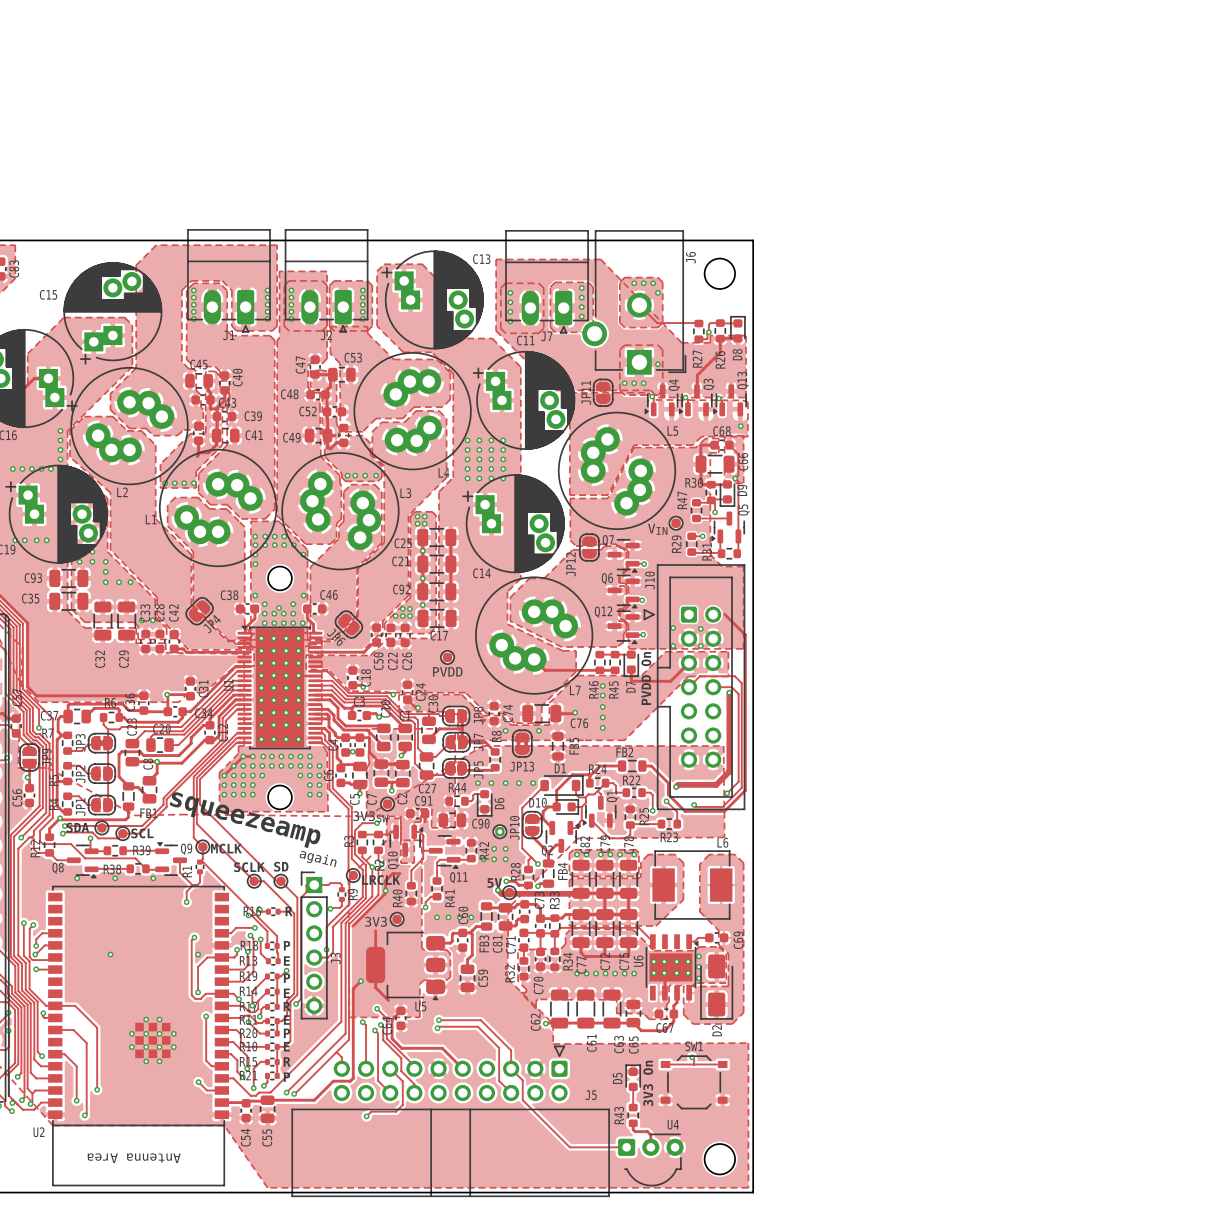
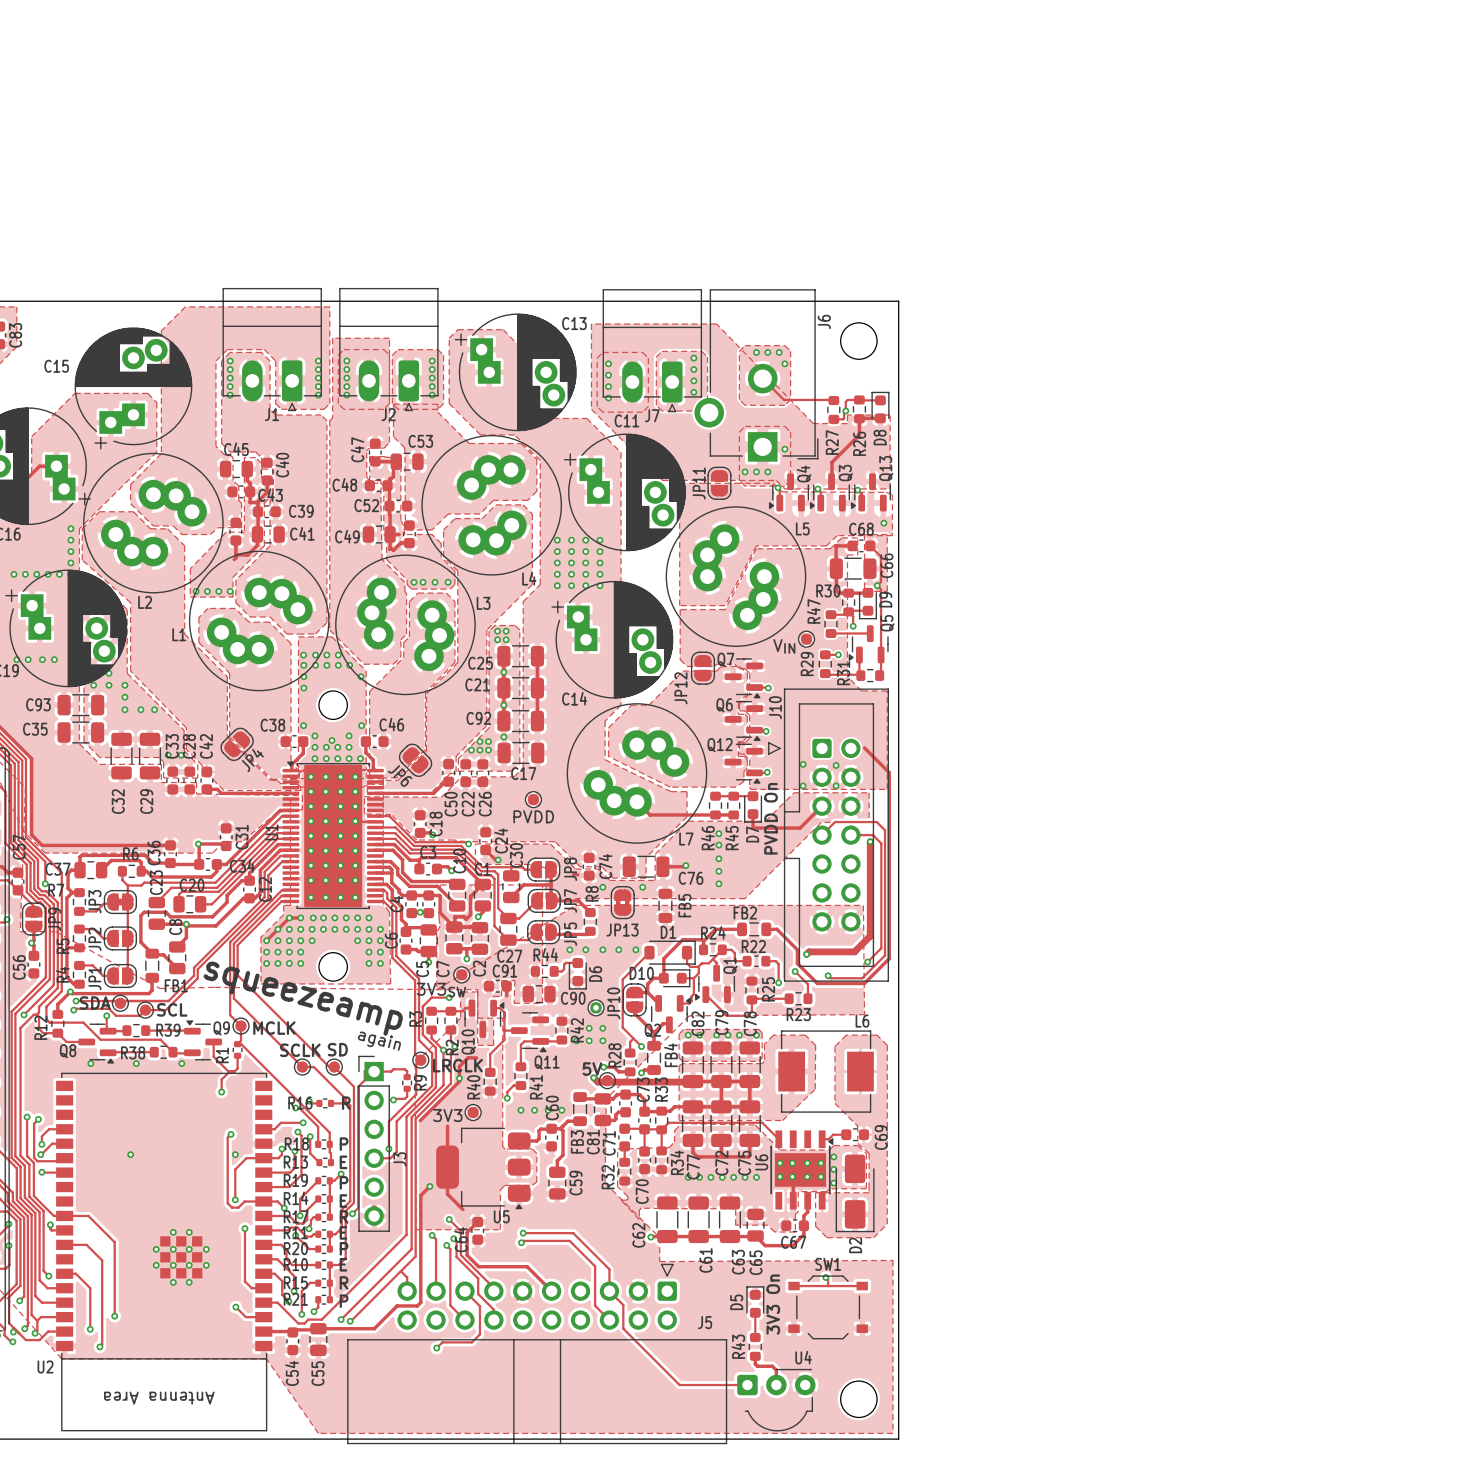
track: none -> (482, 889) (482, 884) (470, 896) (470, 914) (466, 919) (464, 916) (454, 916) (454, 927)

